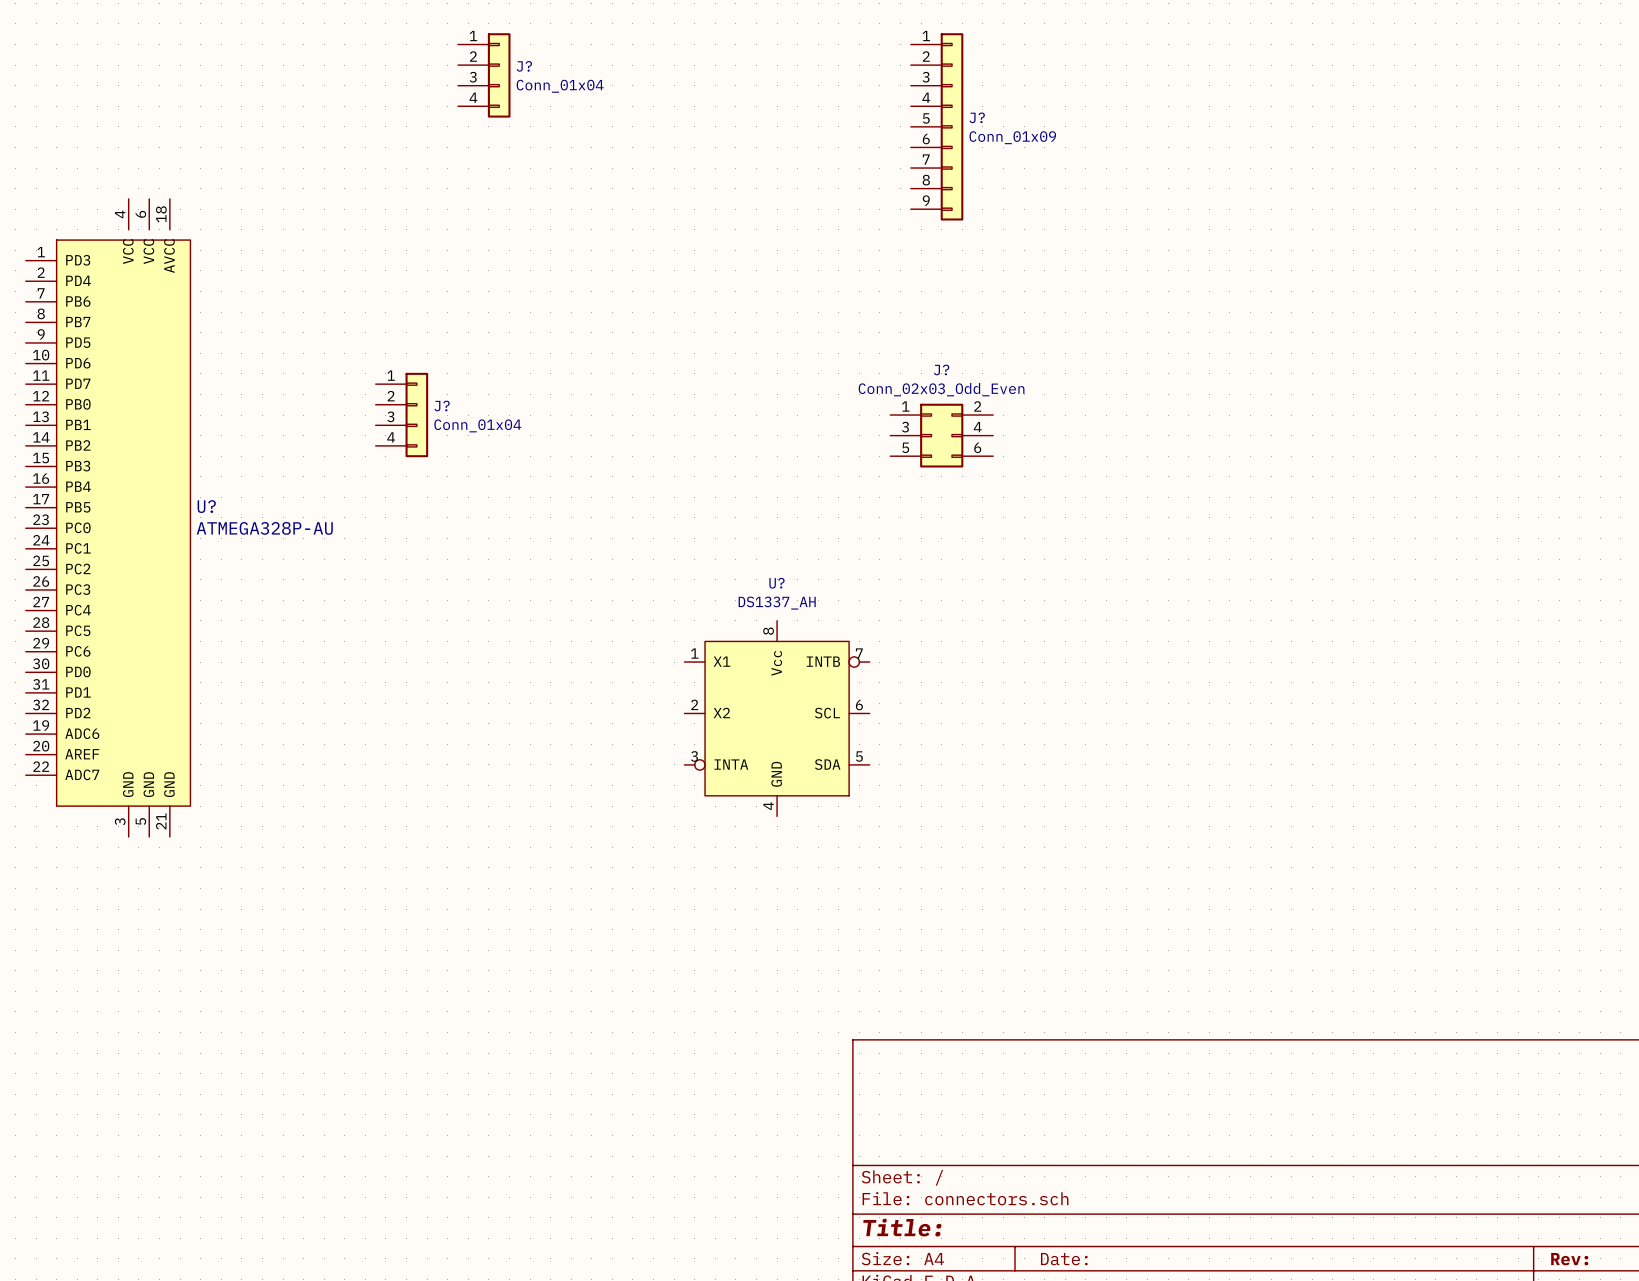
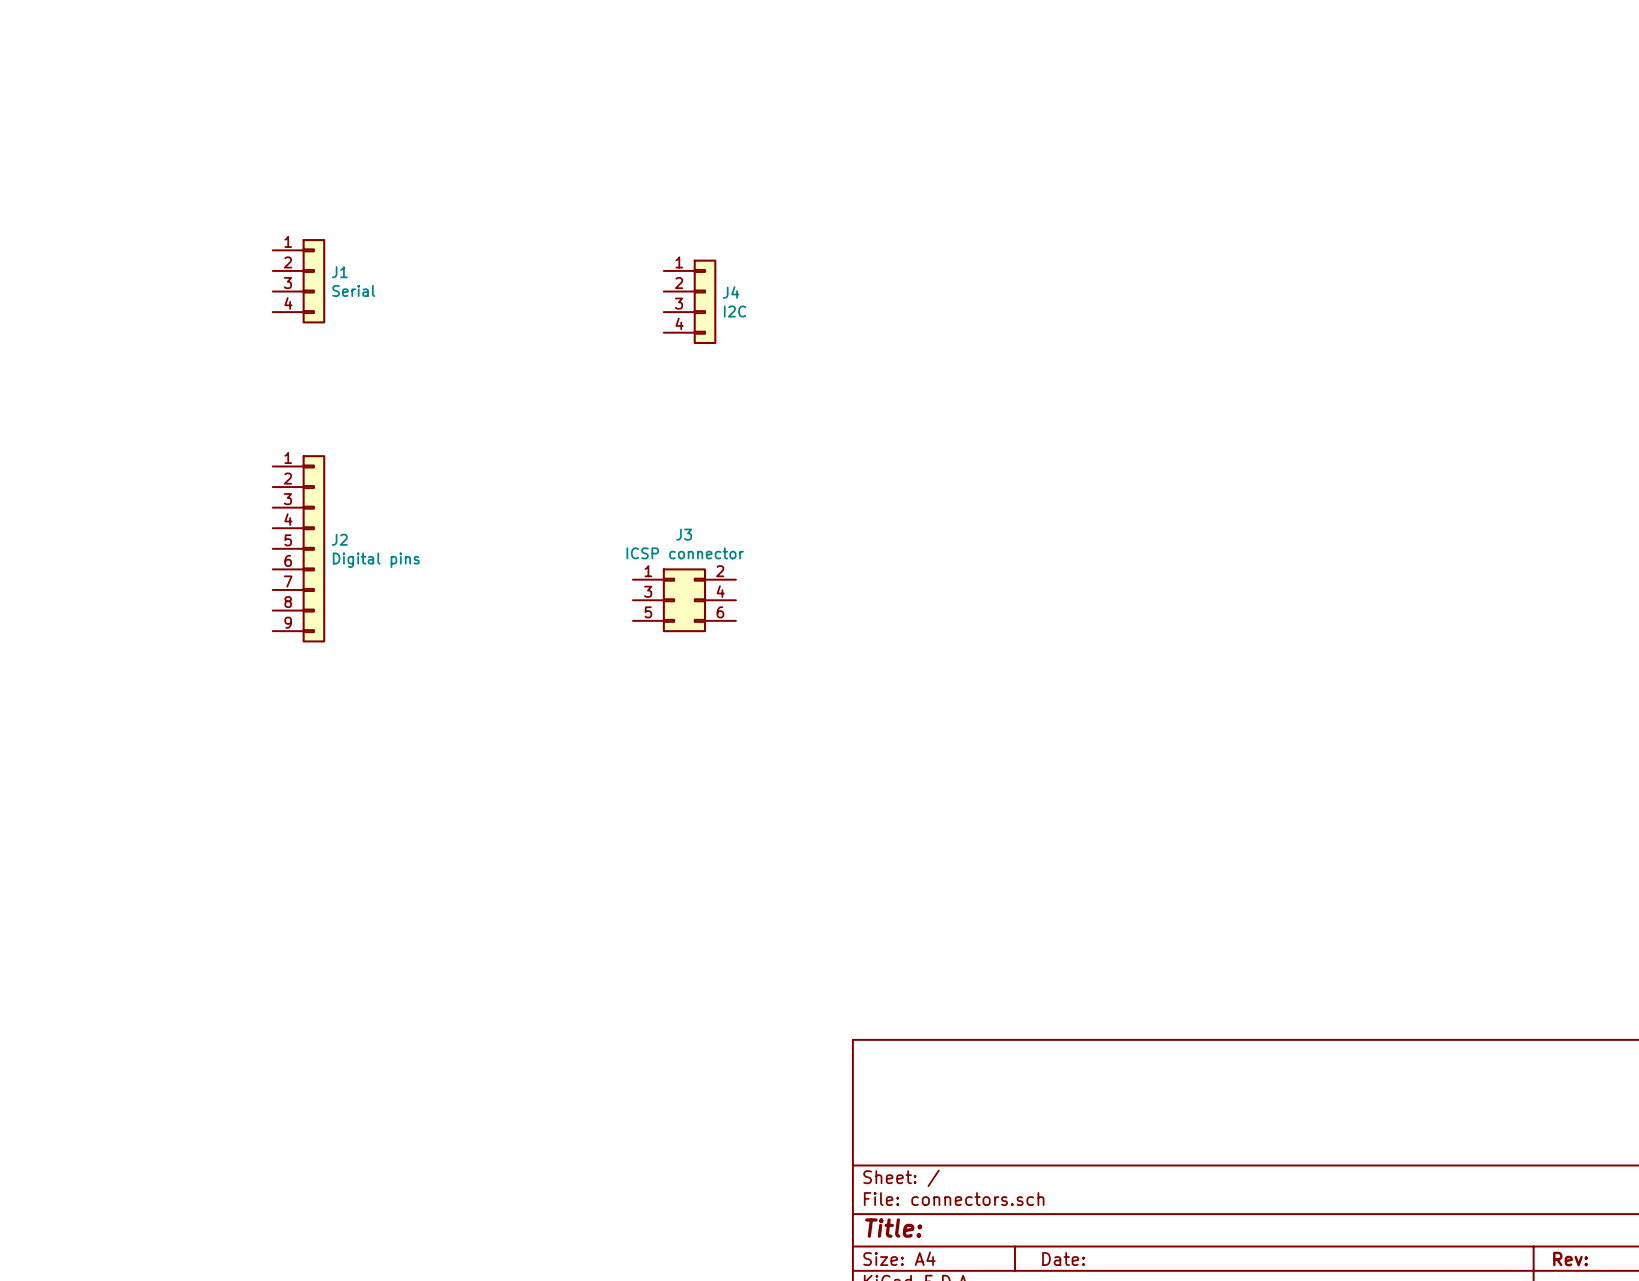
J?: Conn_01x04 (484, 75) -> none
J?: Conn_01x09 (937, 126) -> none
J1: none -> Serial (299, 281)
J4: none -> I2C (690, 301)
J?: Conn_01x04 (401, 415) -> none
J?: Conn_02x03_Odd_Even (941, 435) -> none
U?: ATMEGA328P-AU (108, 517) -> none
J2: none -> Digital pins (299, 548)
J3: none -> ICSP connector (684, 600)
U?: DS1337_AH (777, 718) -> none

